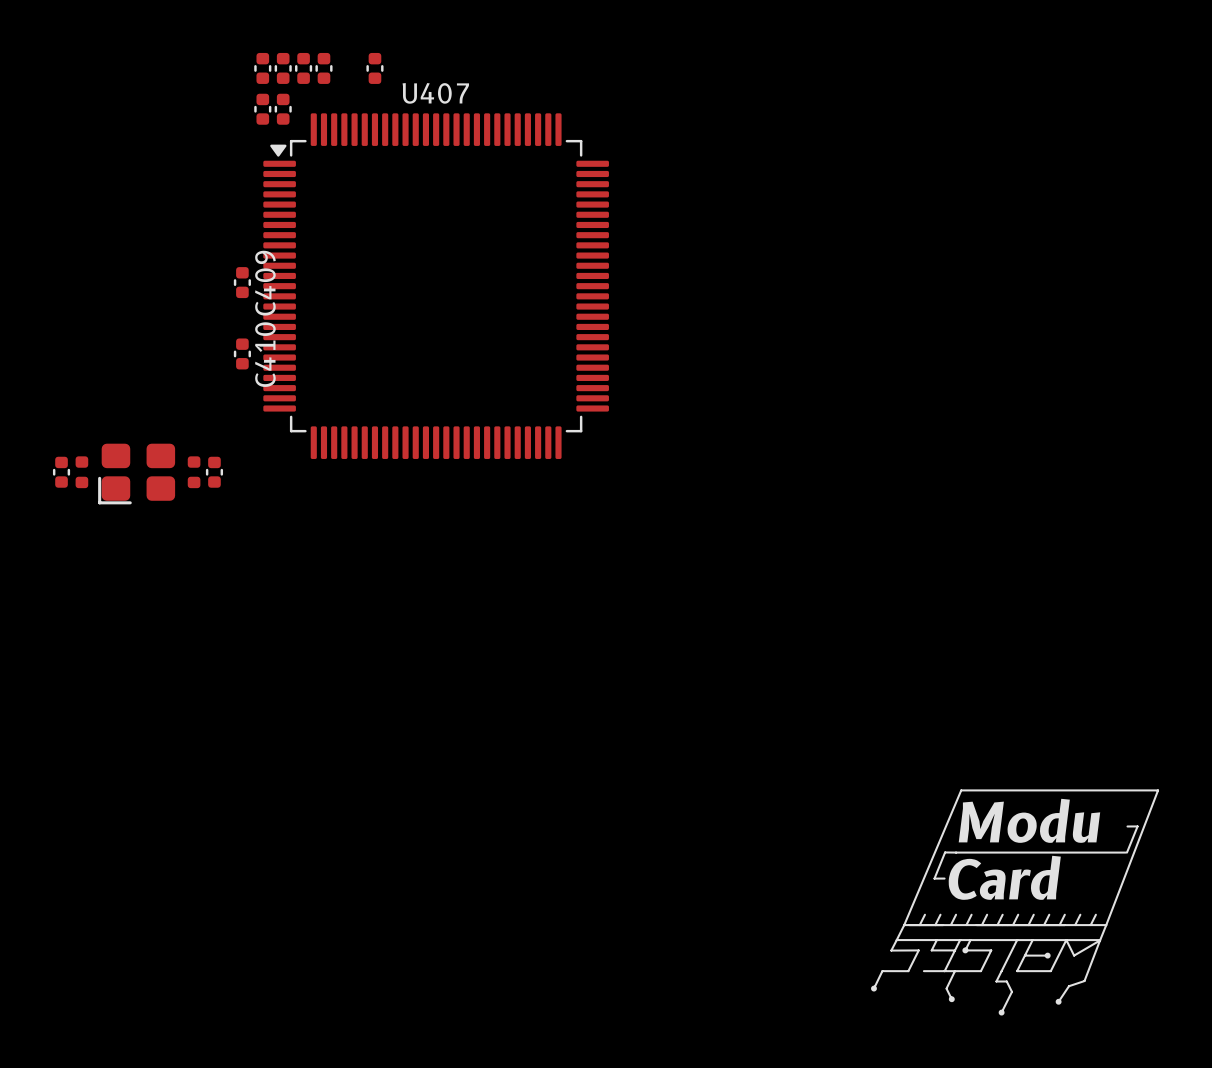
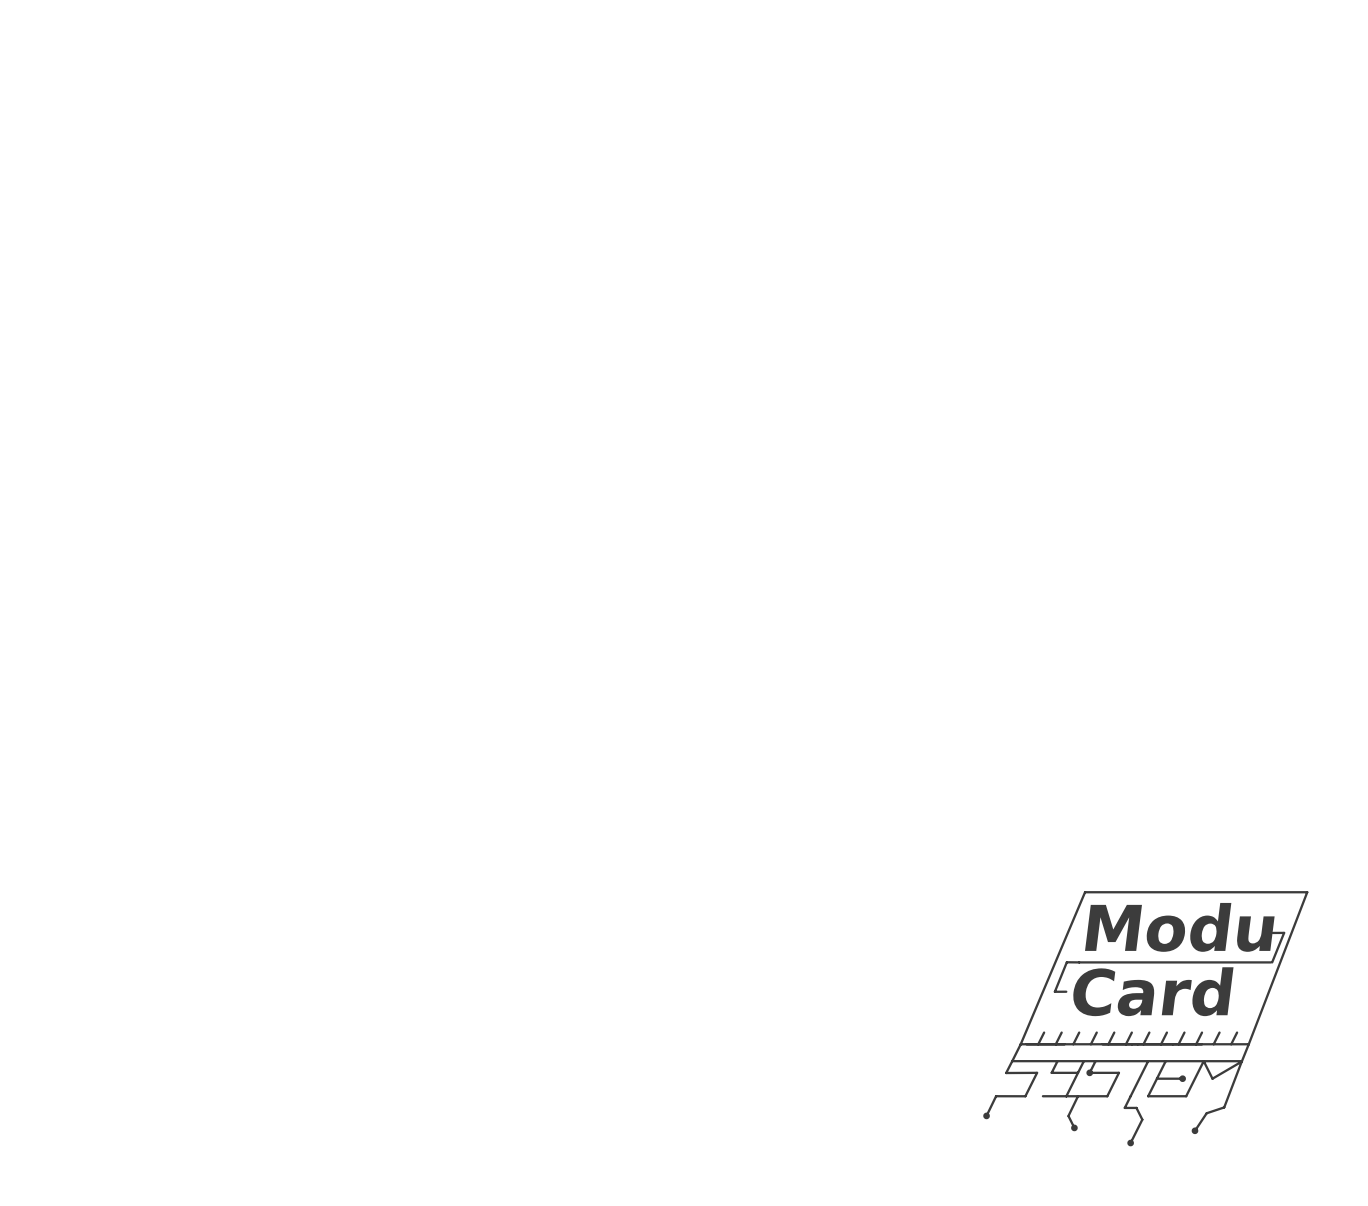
part: (262, 68) -> none
part: (283, 68) -> none
part: (303, 68) -> none
part: (323, 68) -> none
part: (374, 68) -> none
part: (262, 109) -> none
part: (283, 109) -> none
C409: (242, 282) -> none
U407: (436, 286) -> none
C410: (242, 353) -> none
part: (61, 472) -> none
part: (81, 472) -> none
part: (194, 472) -> none
part: (214, 472) -> none
part: (136, 474) -> none

